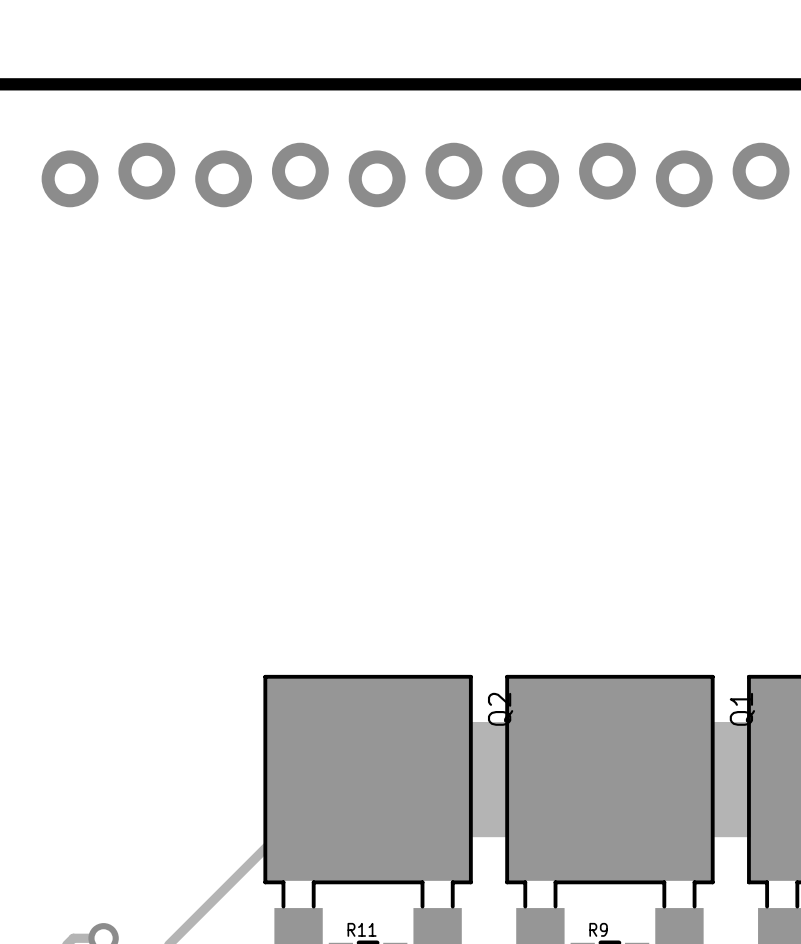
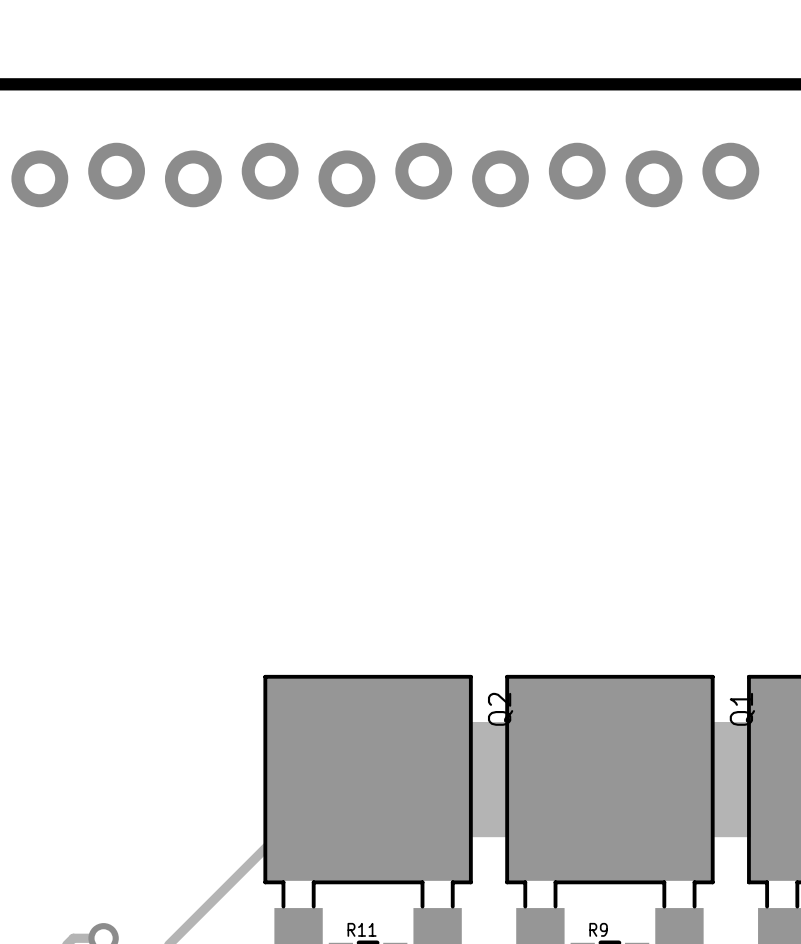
part position: (415, 175) -> (385, 175)

